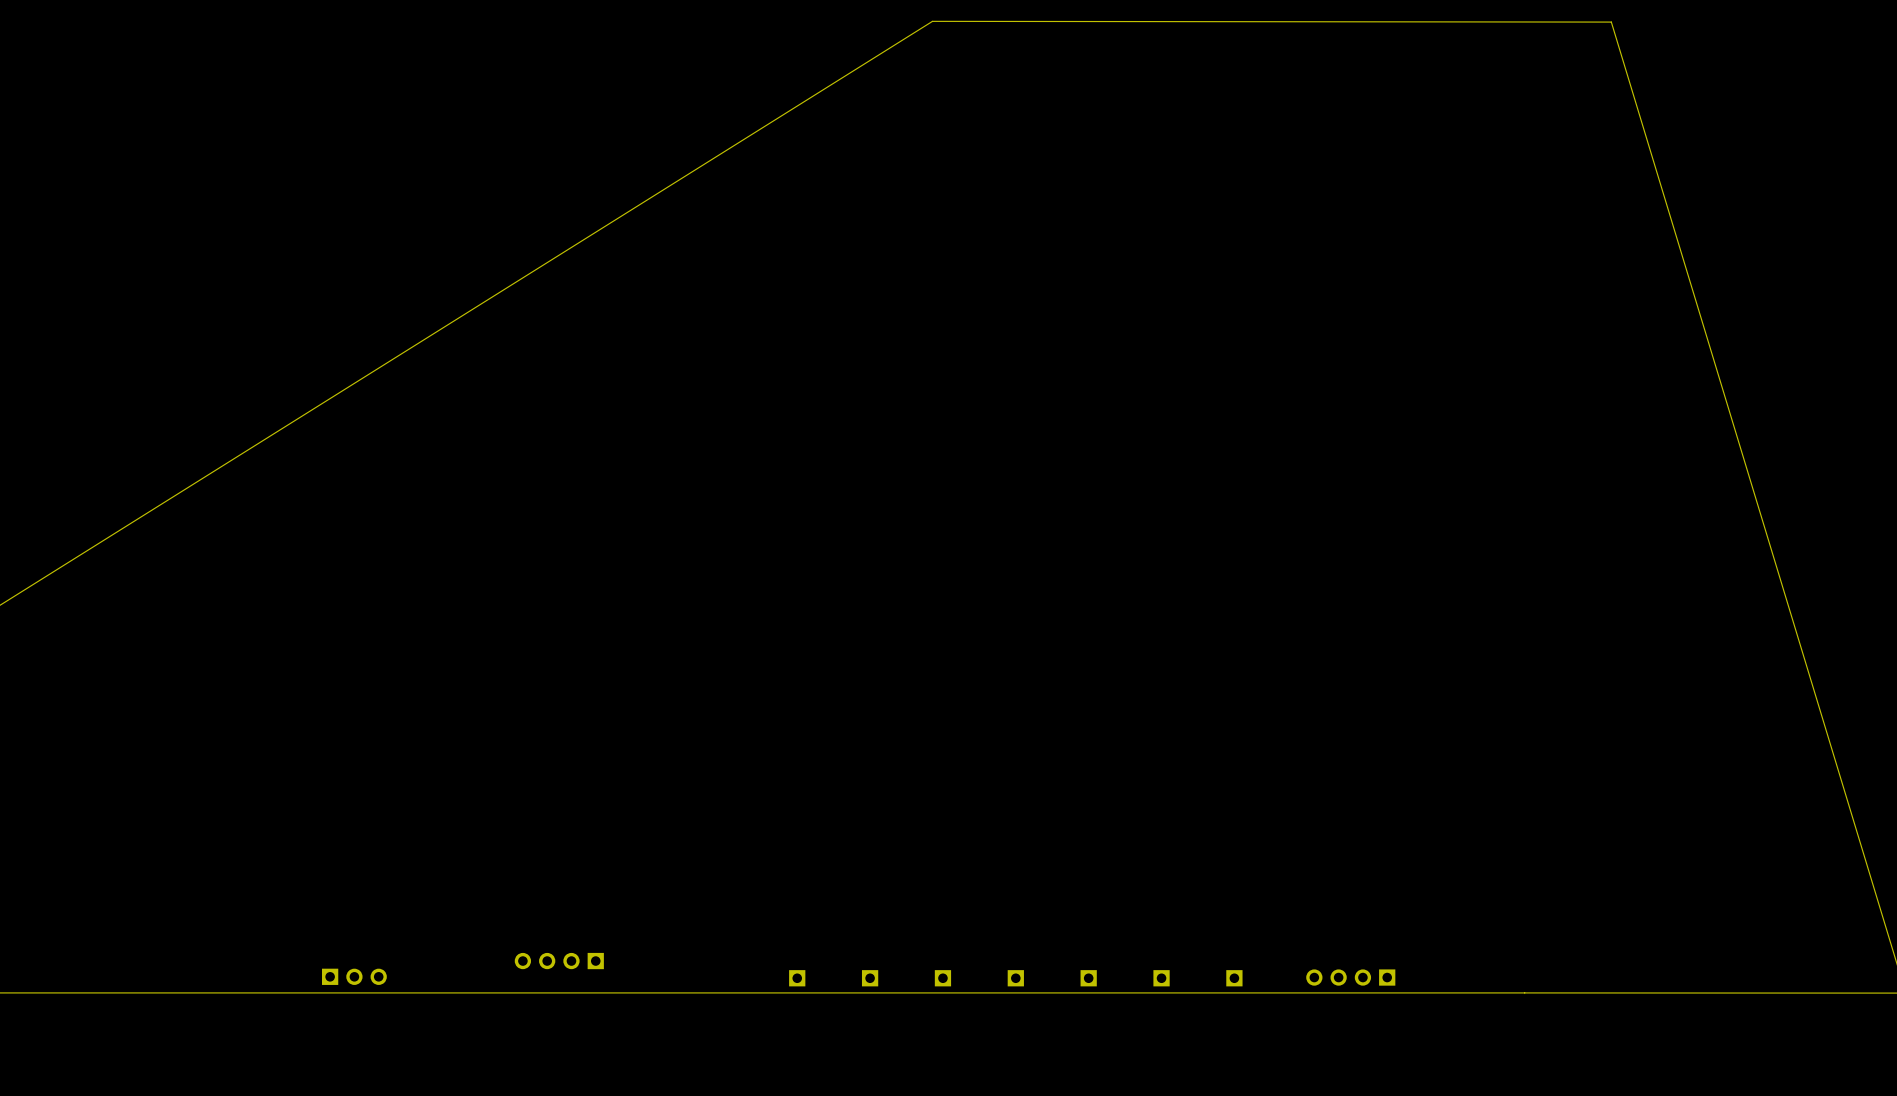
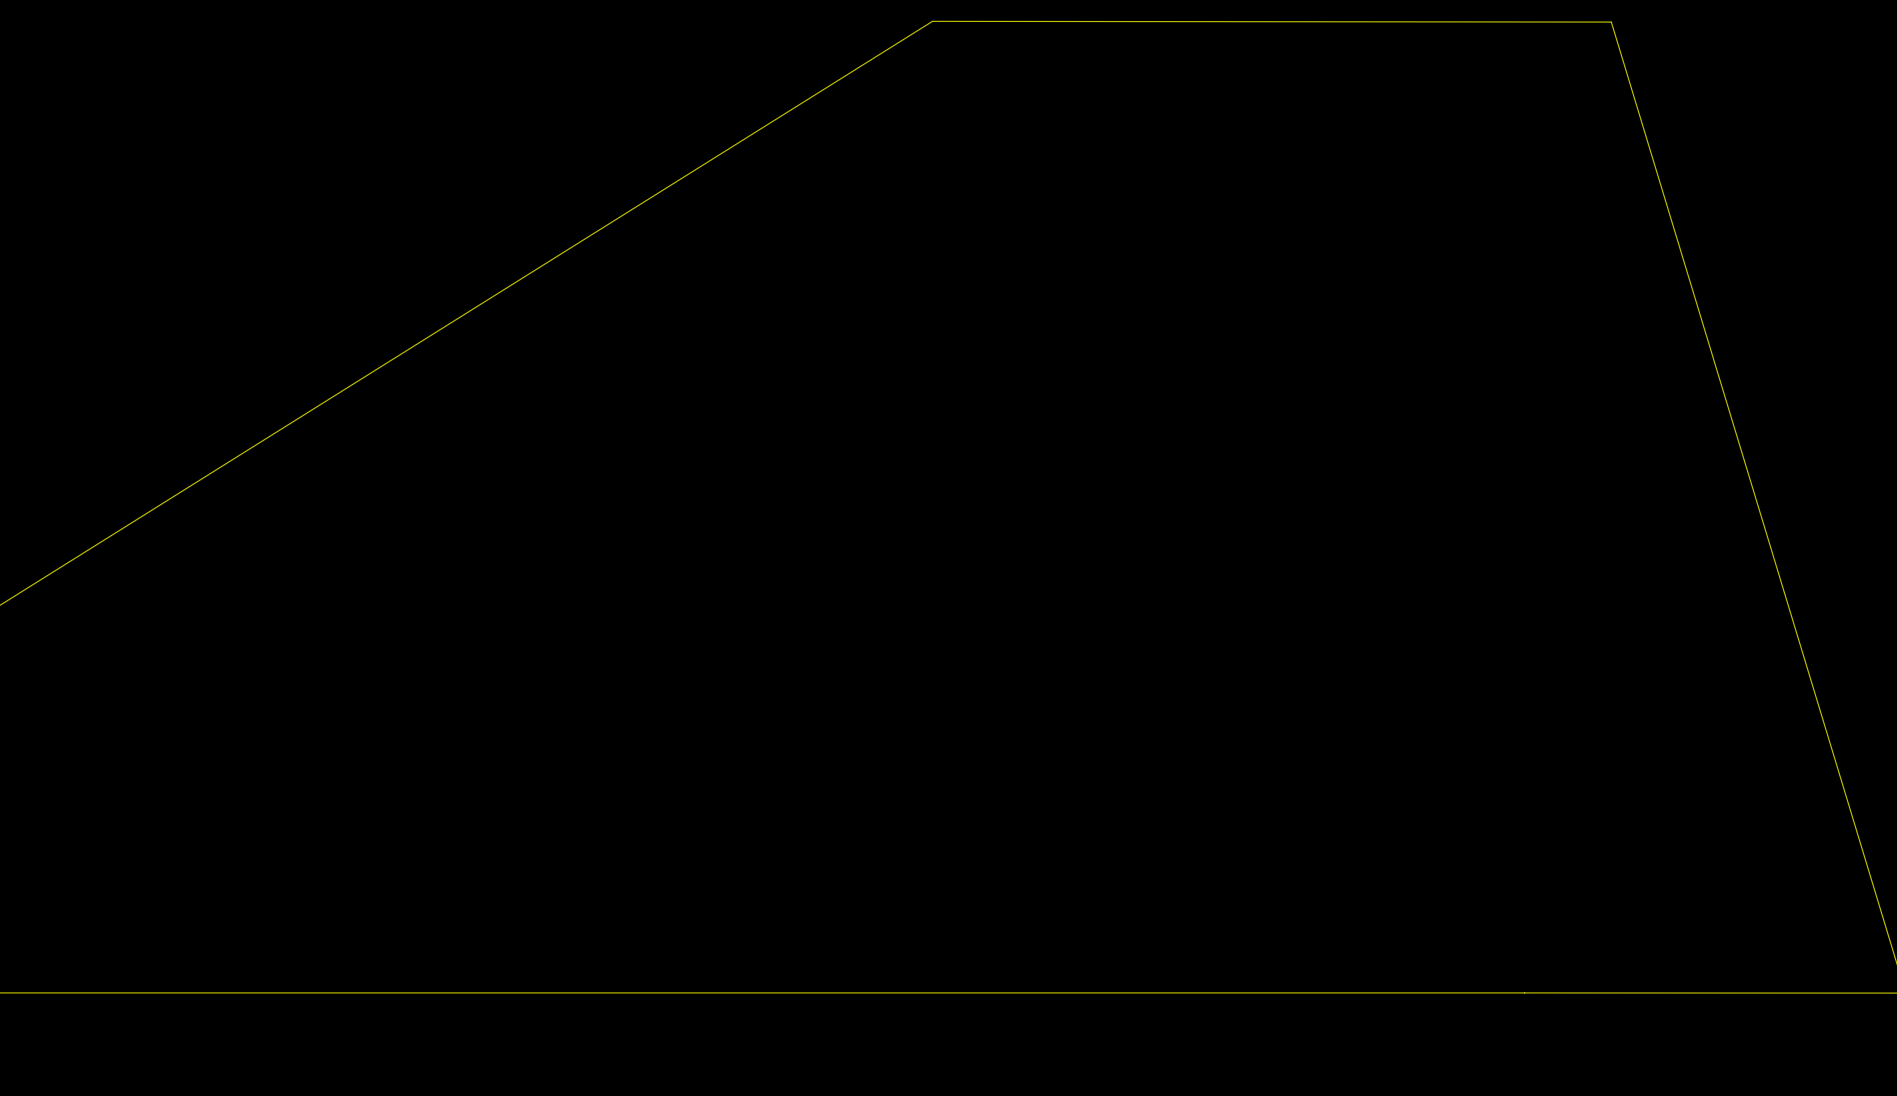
part: (559, 961) -> none
part: (354, 976) -> none
part: (1350, 977) -> none
part: (797, 978) -> none
part: (870, 978) -> none
part: (942, 978) -> none
part: (1015, 978) -> none
part: (1088, 978) -> none
part: (1161, 978) -> none
part: (1234, 978) -> none

